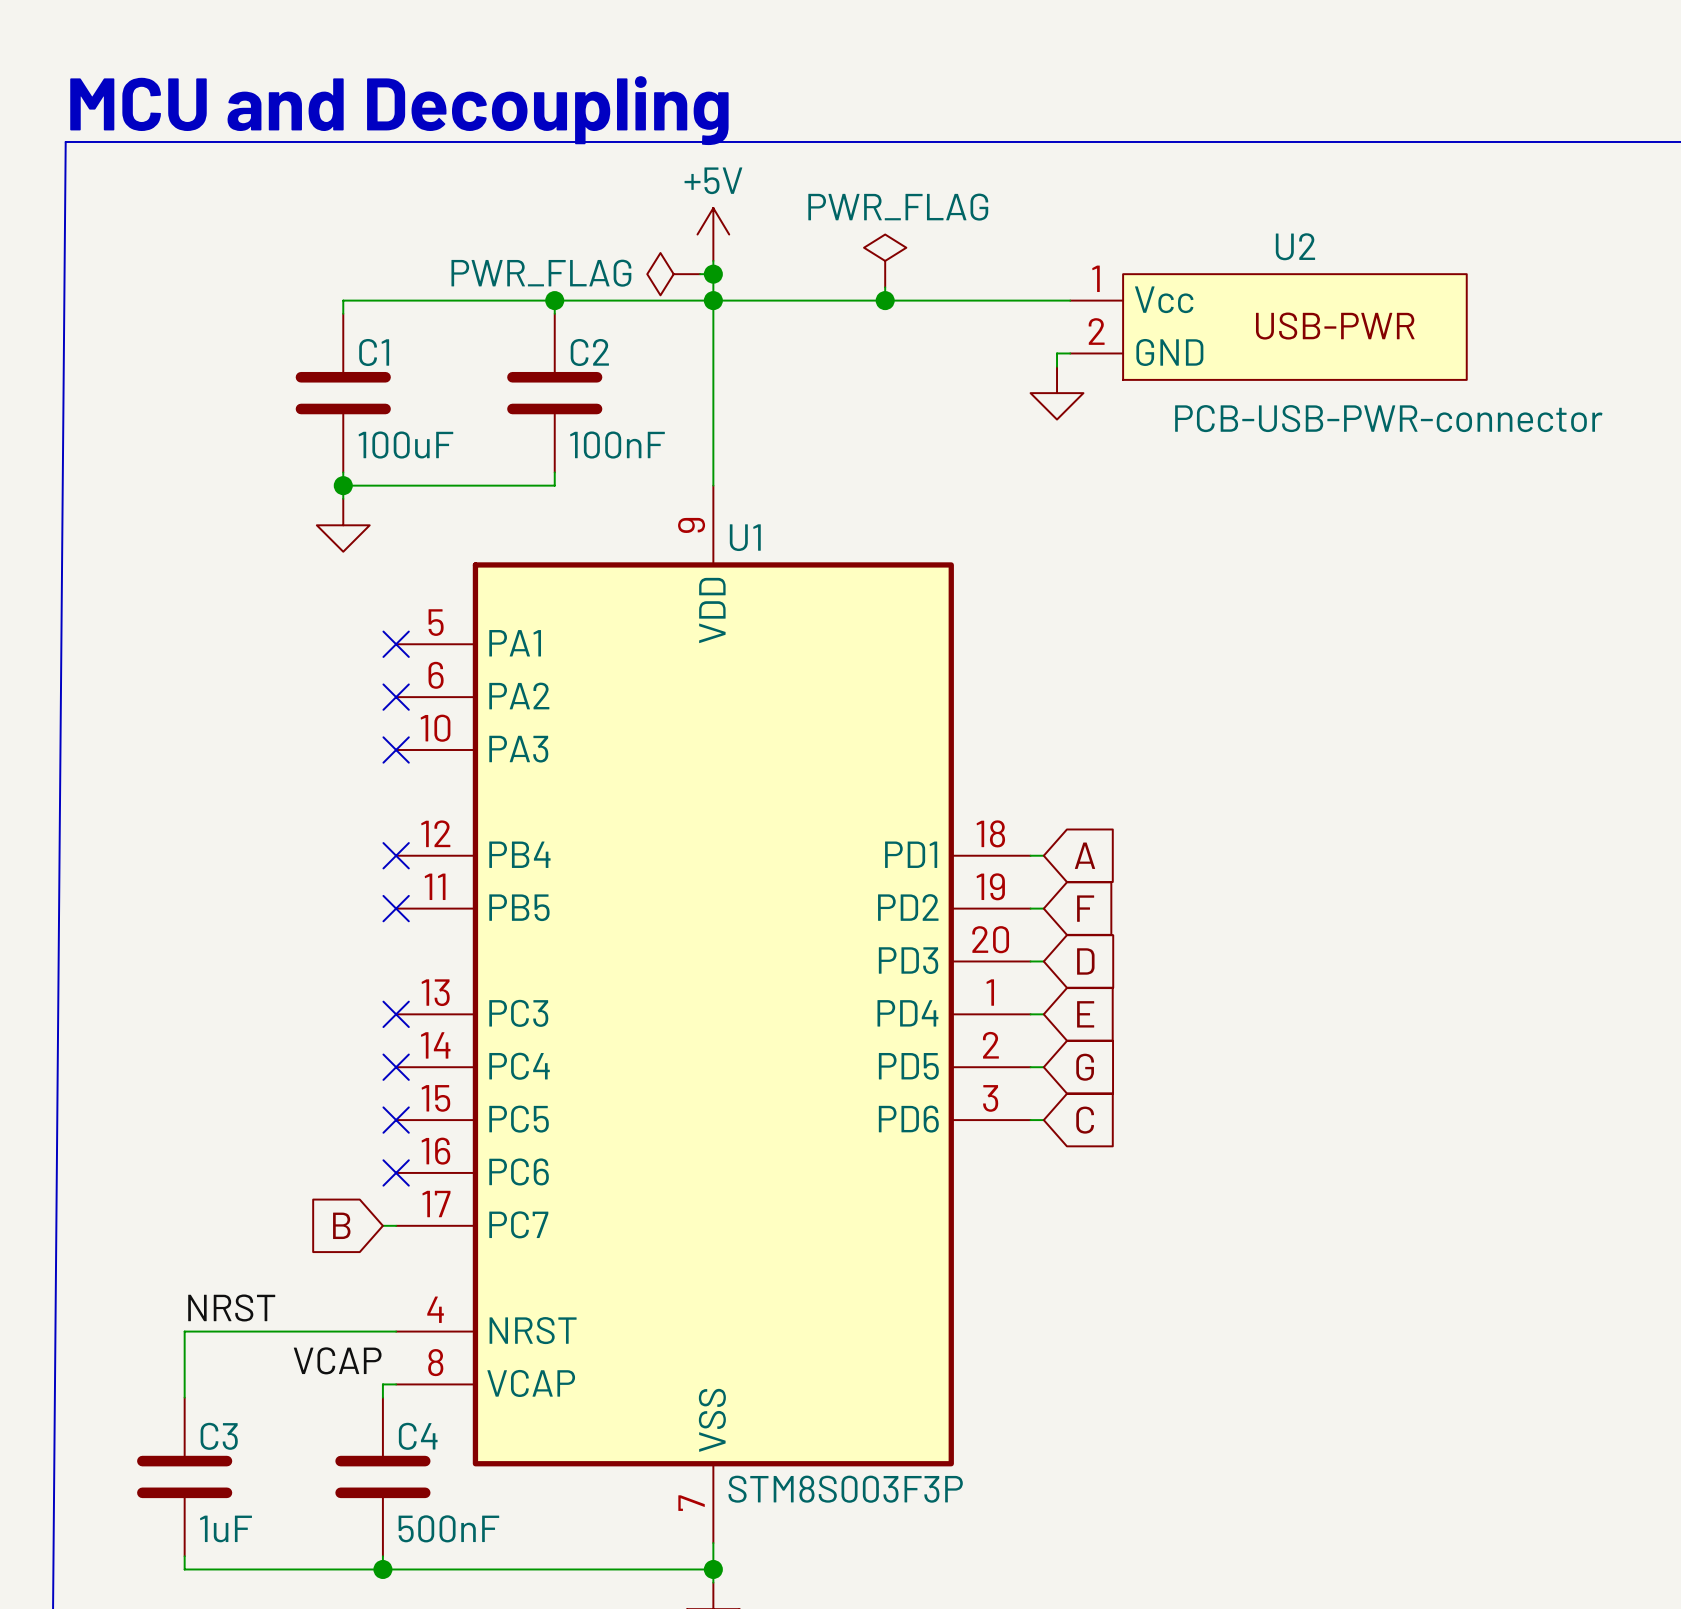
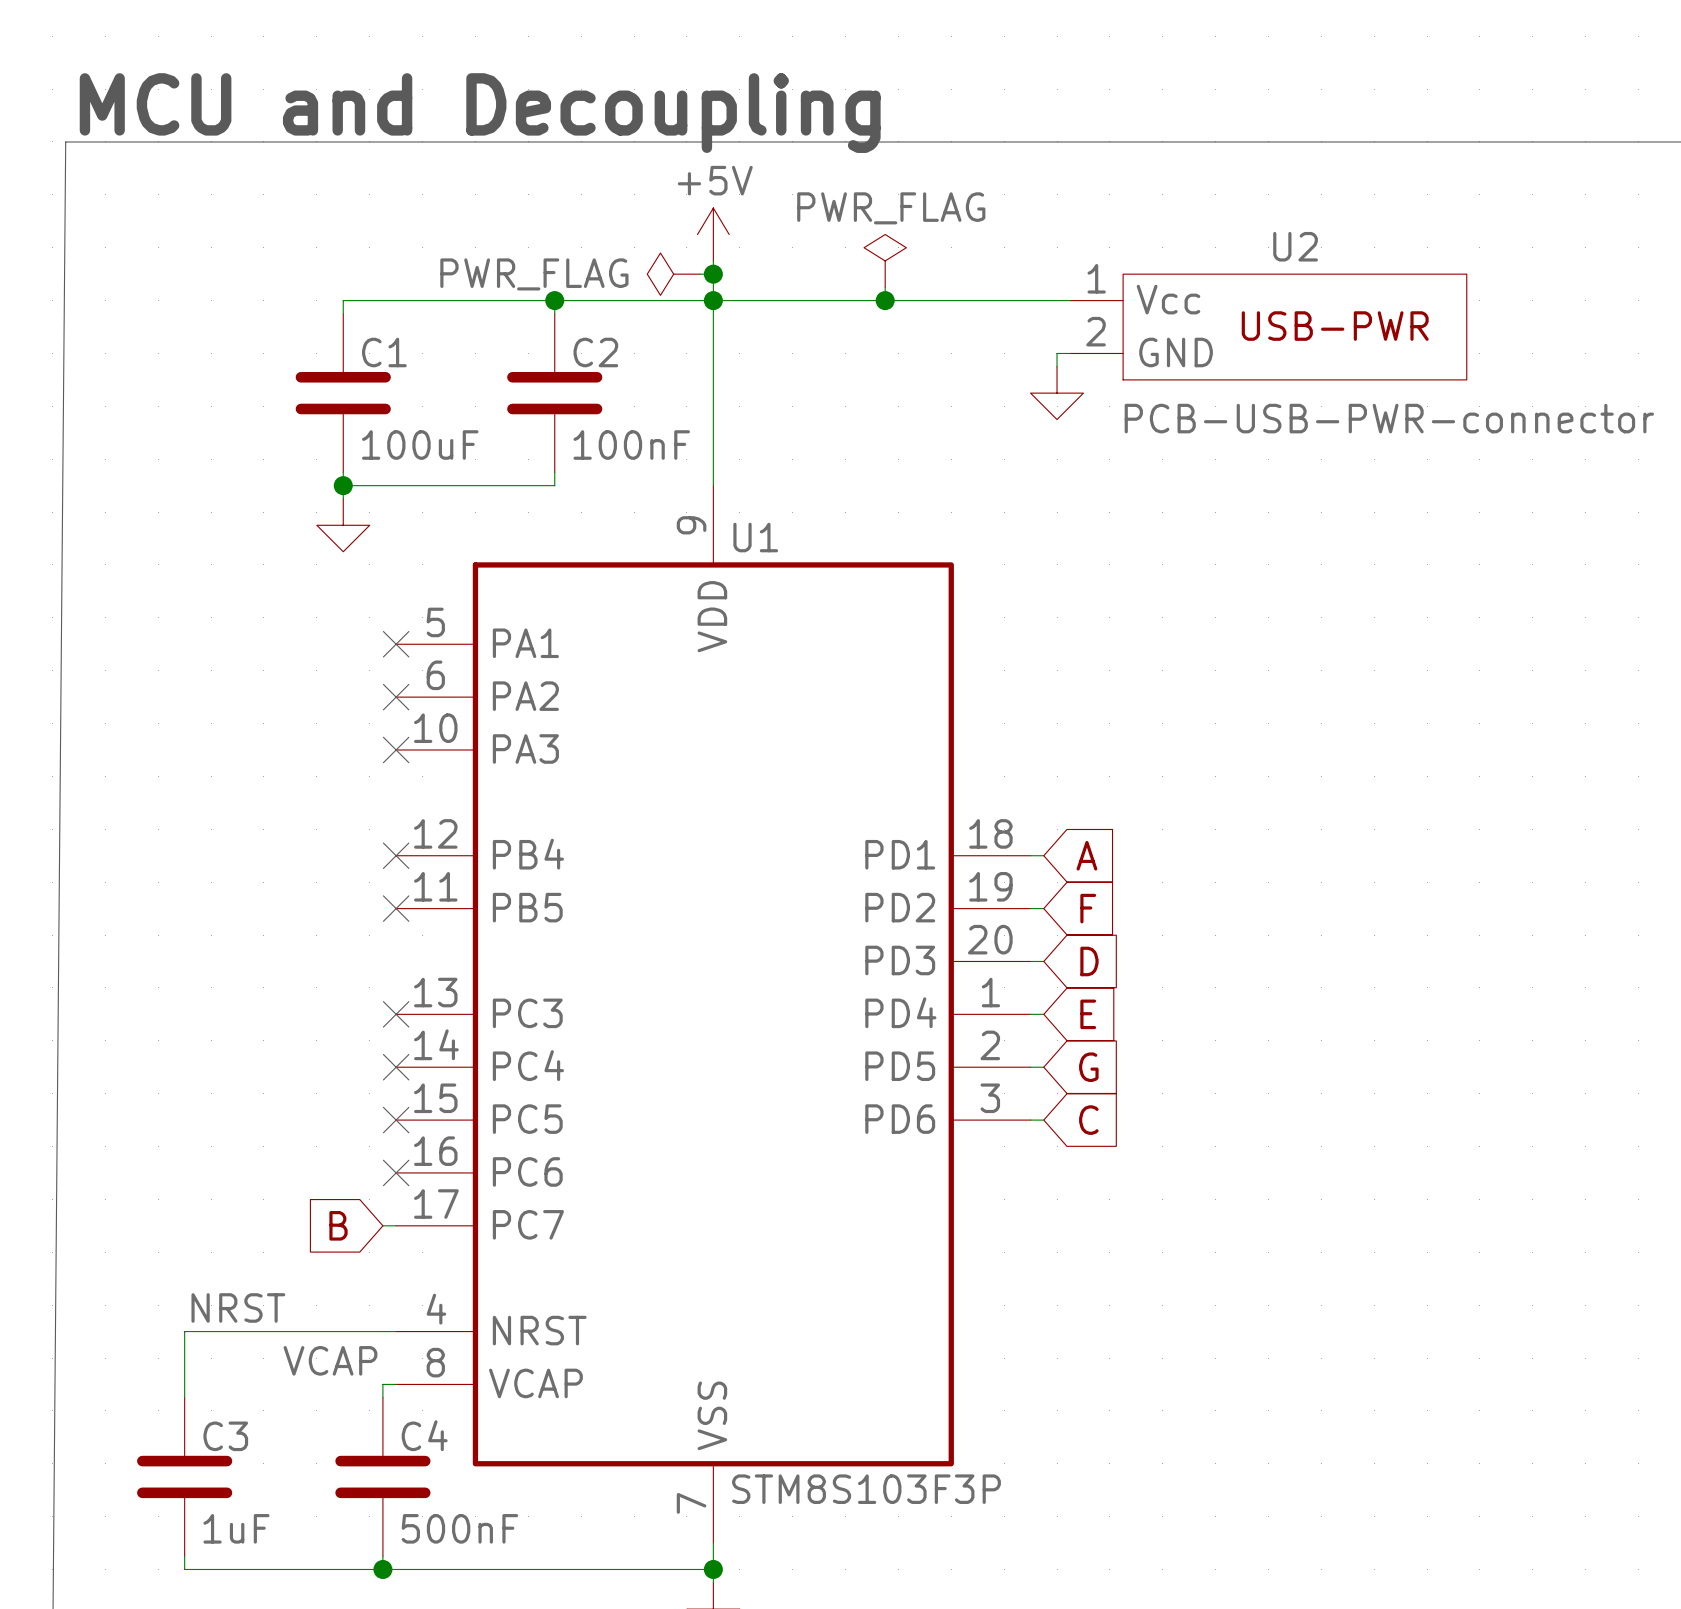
U1 value: STM8S003F3P (845, 1489) -> STM8S103F3P (866, 1489)

